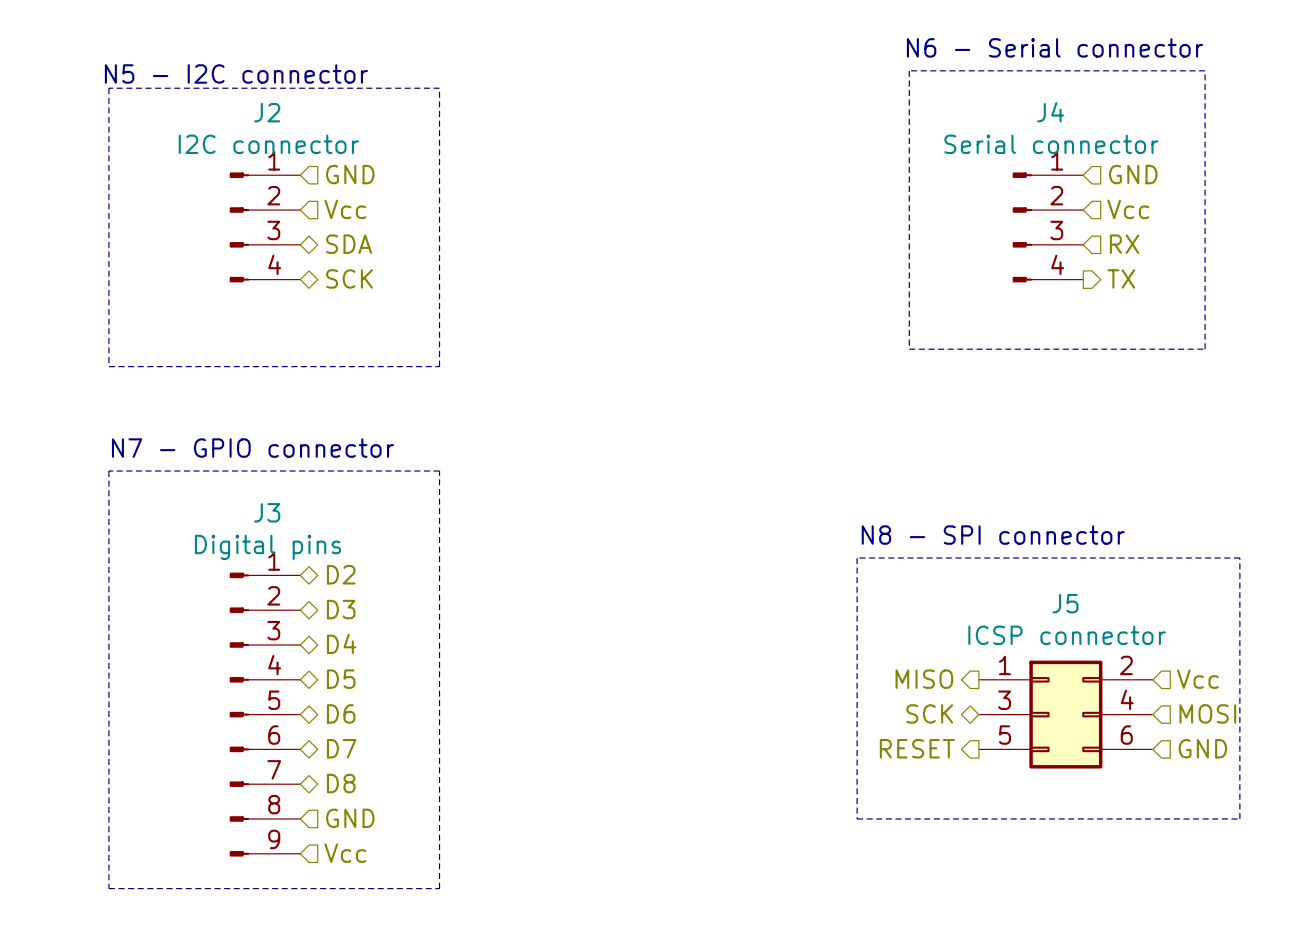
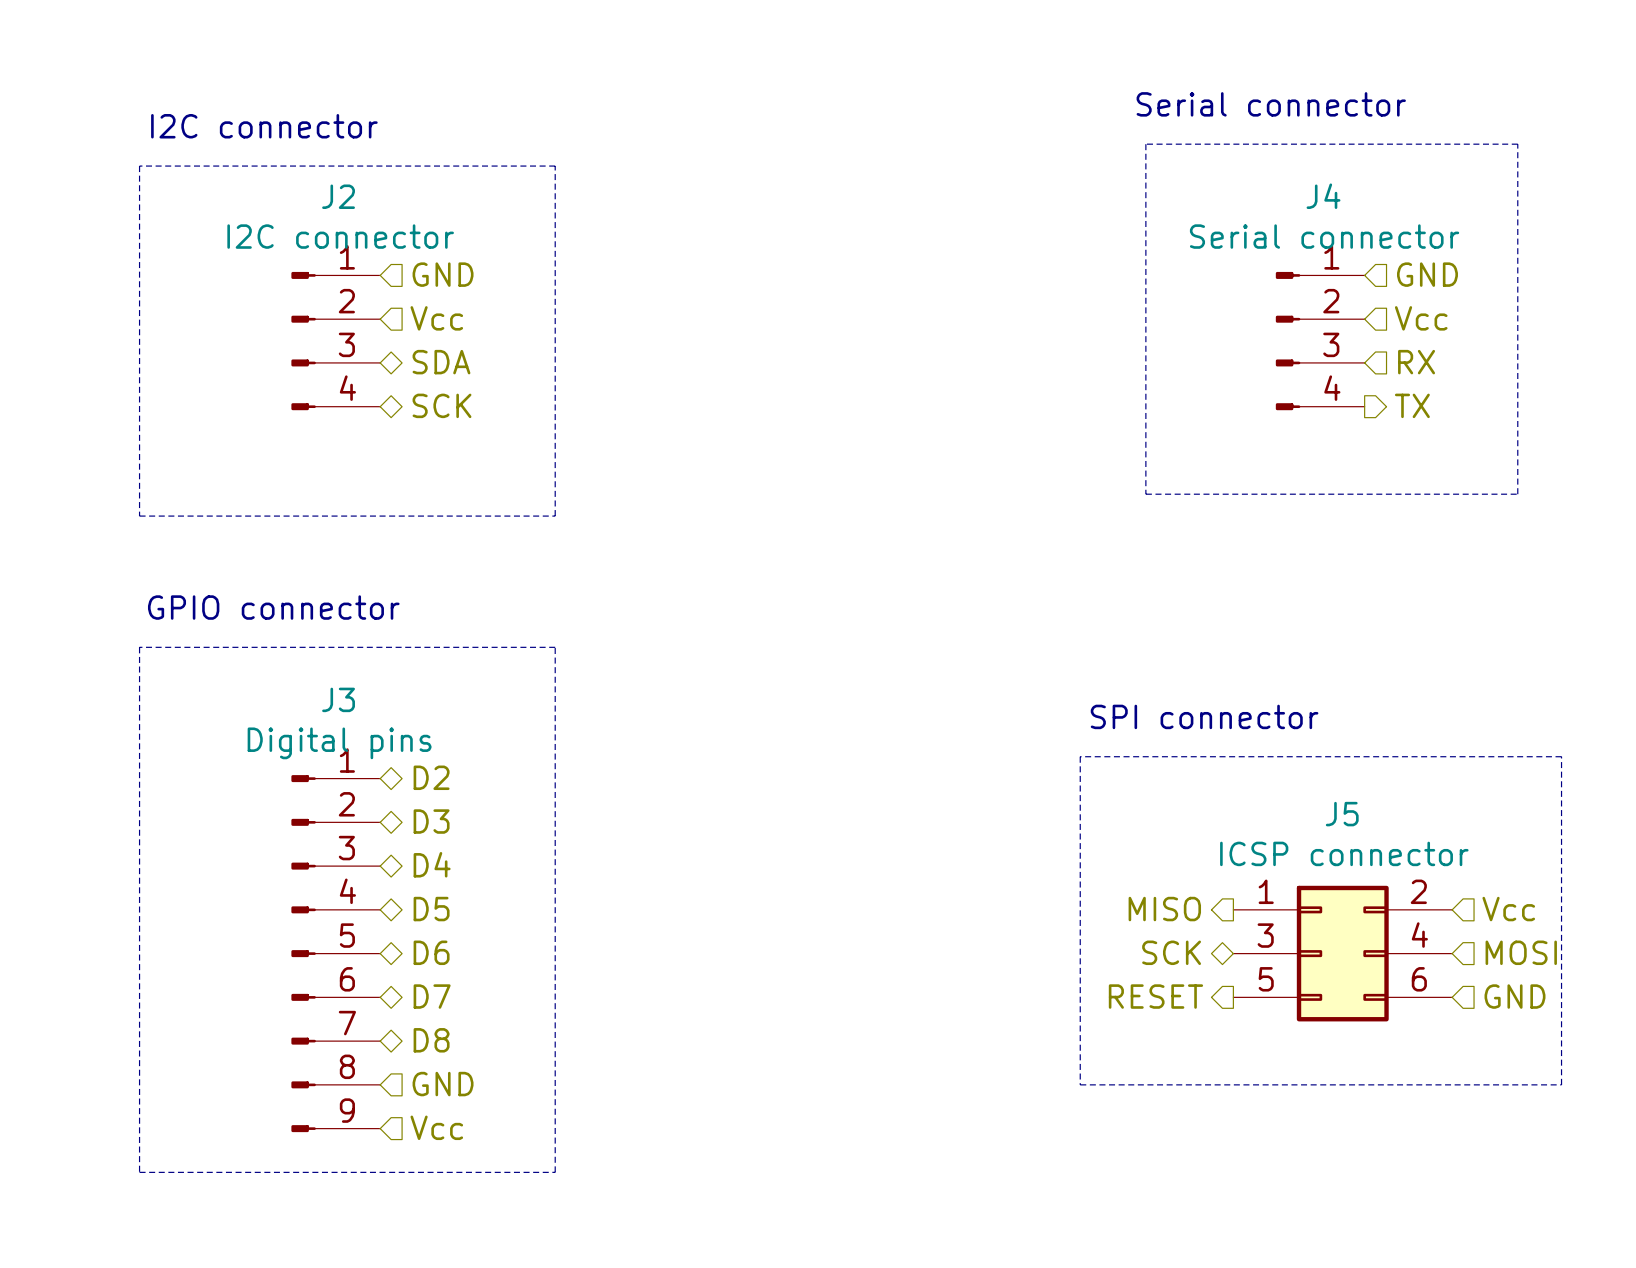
text: N6 - Serial connector (1054, 47) -> Serial connector (1271, 104)
text: N5 - I2C connector (236, 73) -> I2C connector (264, 126)
text: N7 - GPIO connector (252, 448) -> GPIO connector (273, 607)
text: N8 - SPI connector (993, 535) -> SPI connector (1204, 716)

